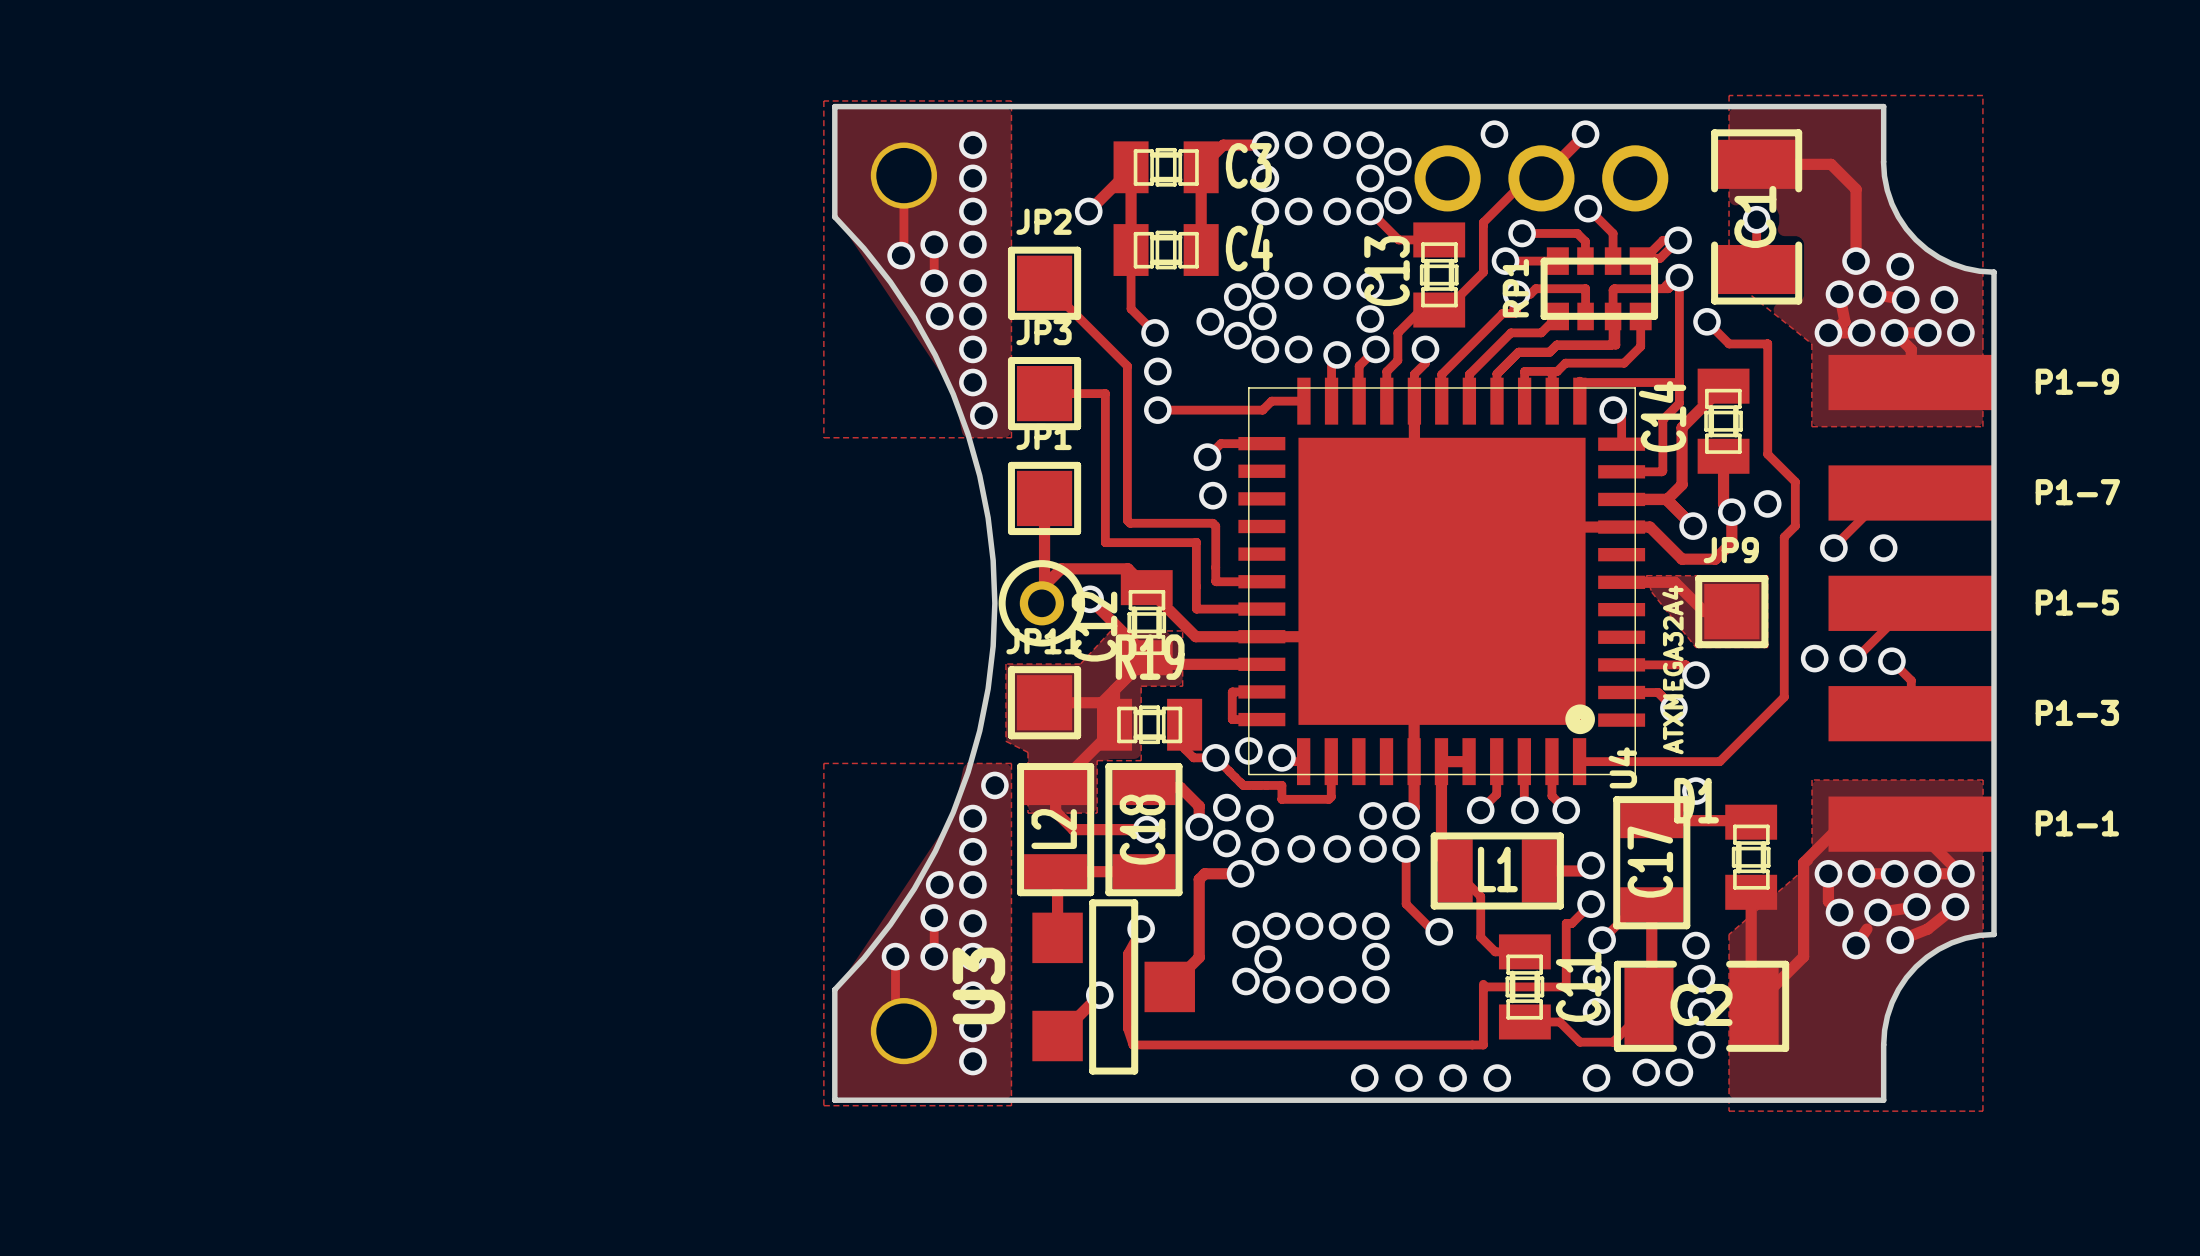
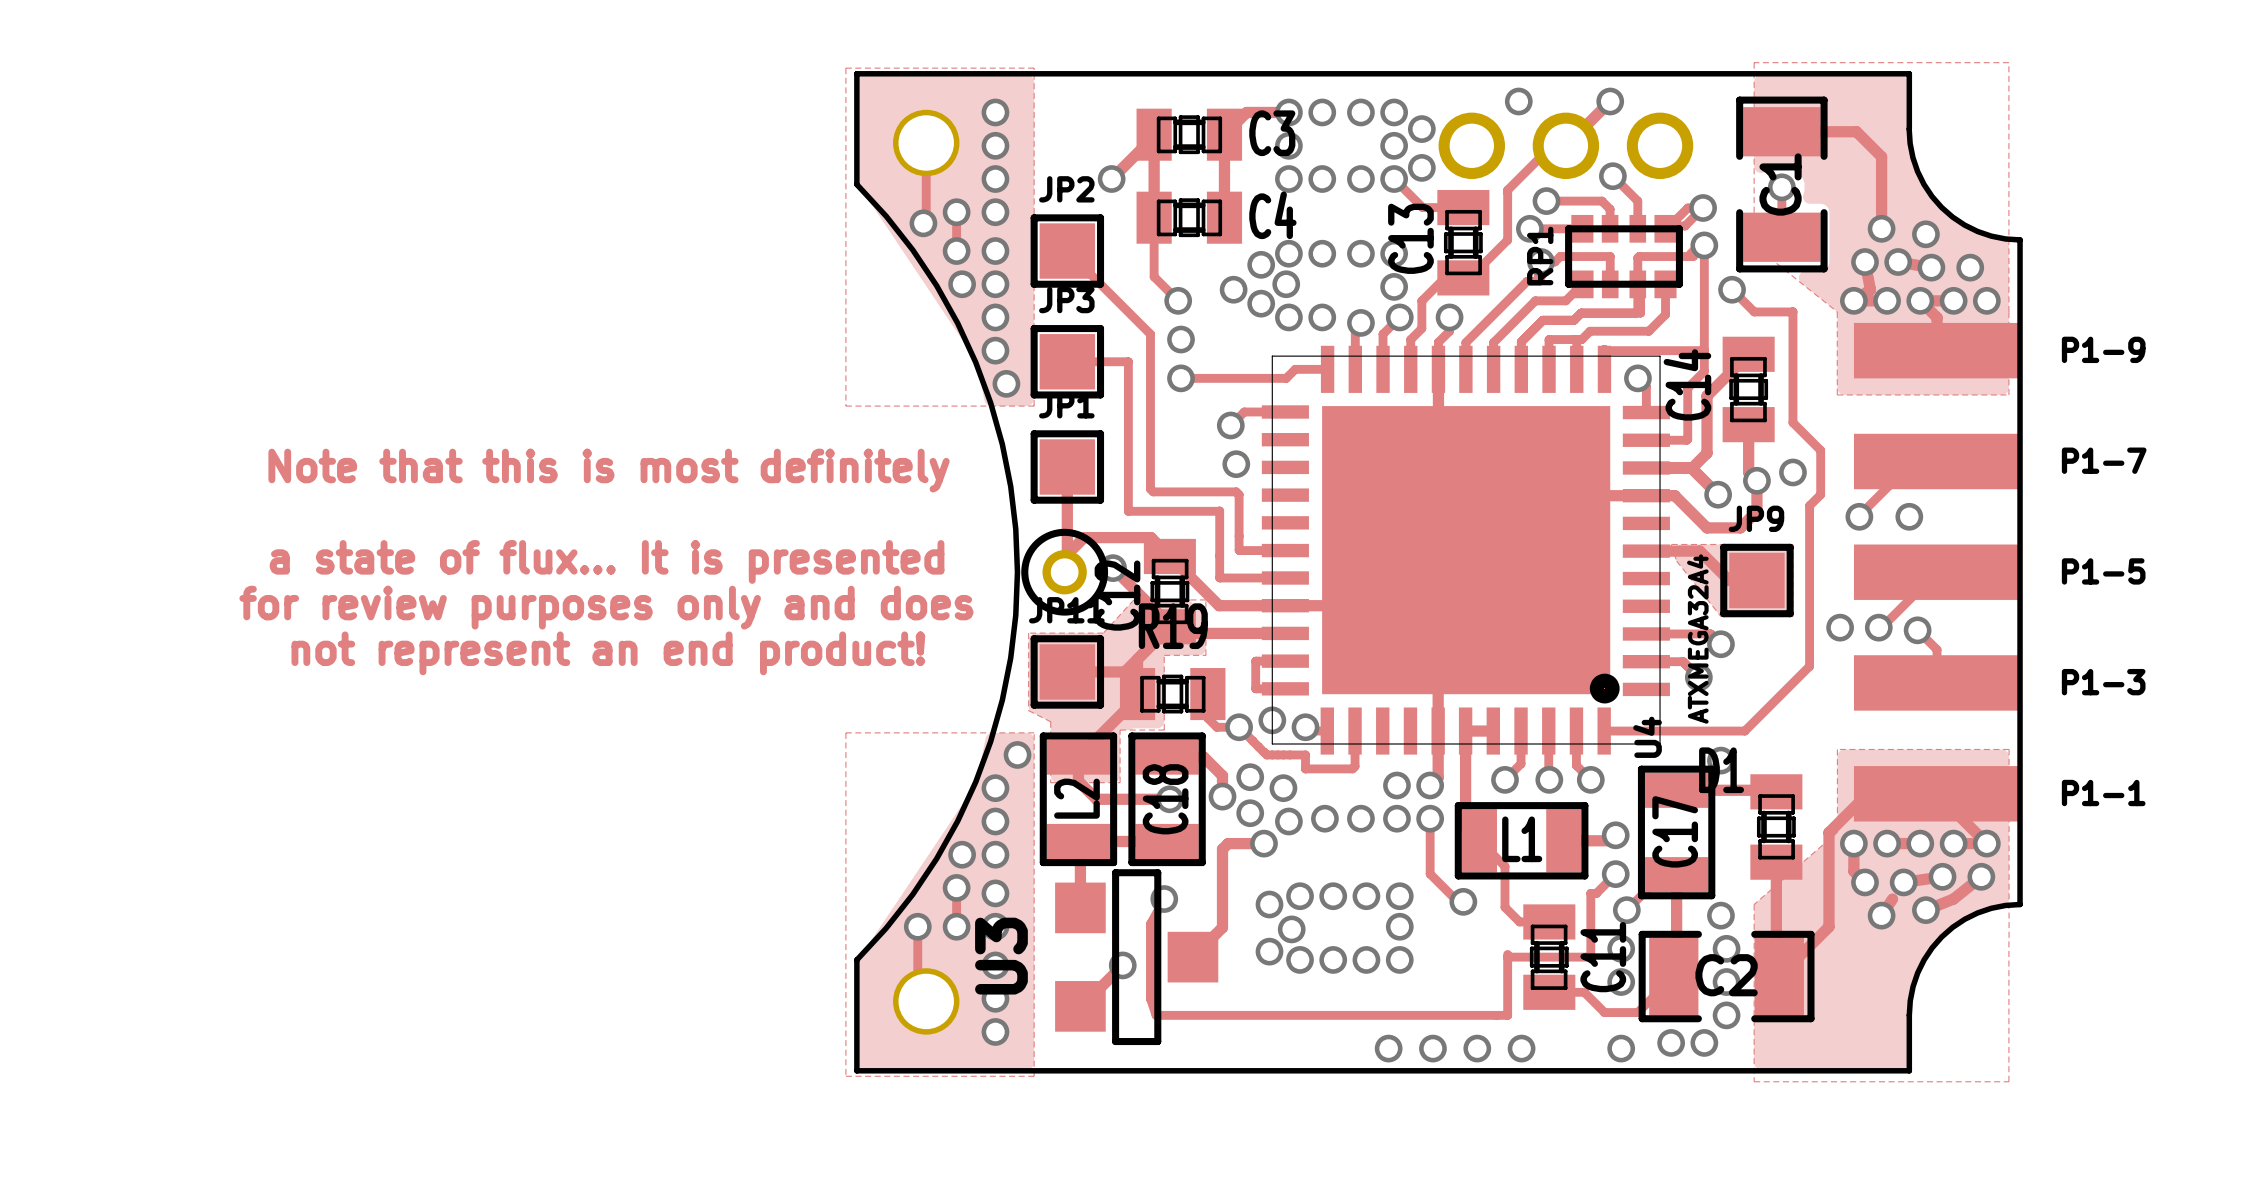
text: none -> Note that this is most definitely (609, 470)
text: none -> a state of flux... It is presented (607, 561)
text: none -> for review purposes only and does (606, 607)
text: none -> not represent an end product! (608, 653)

